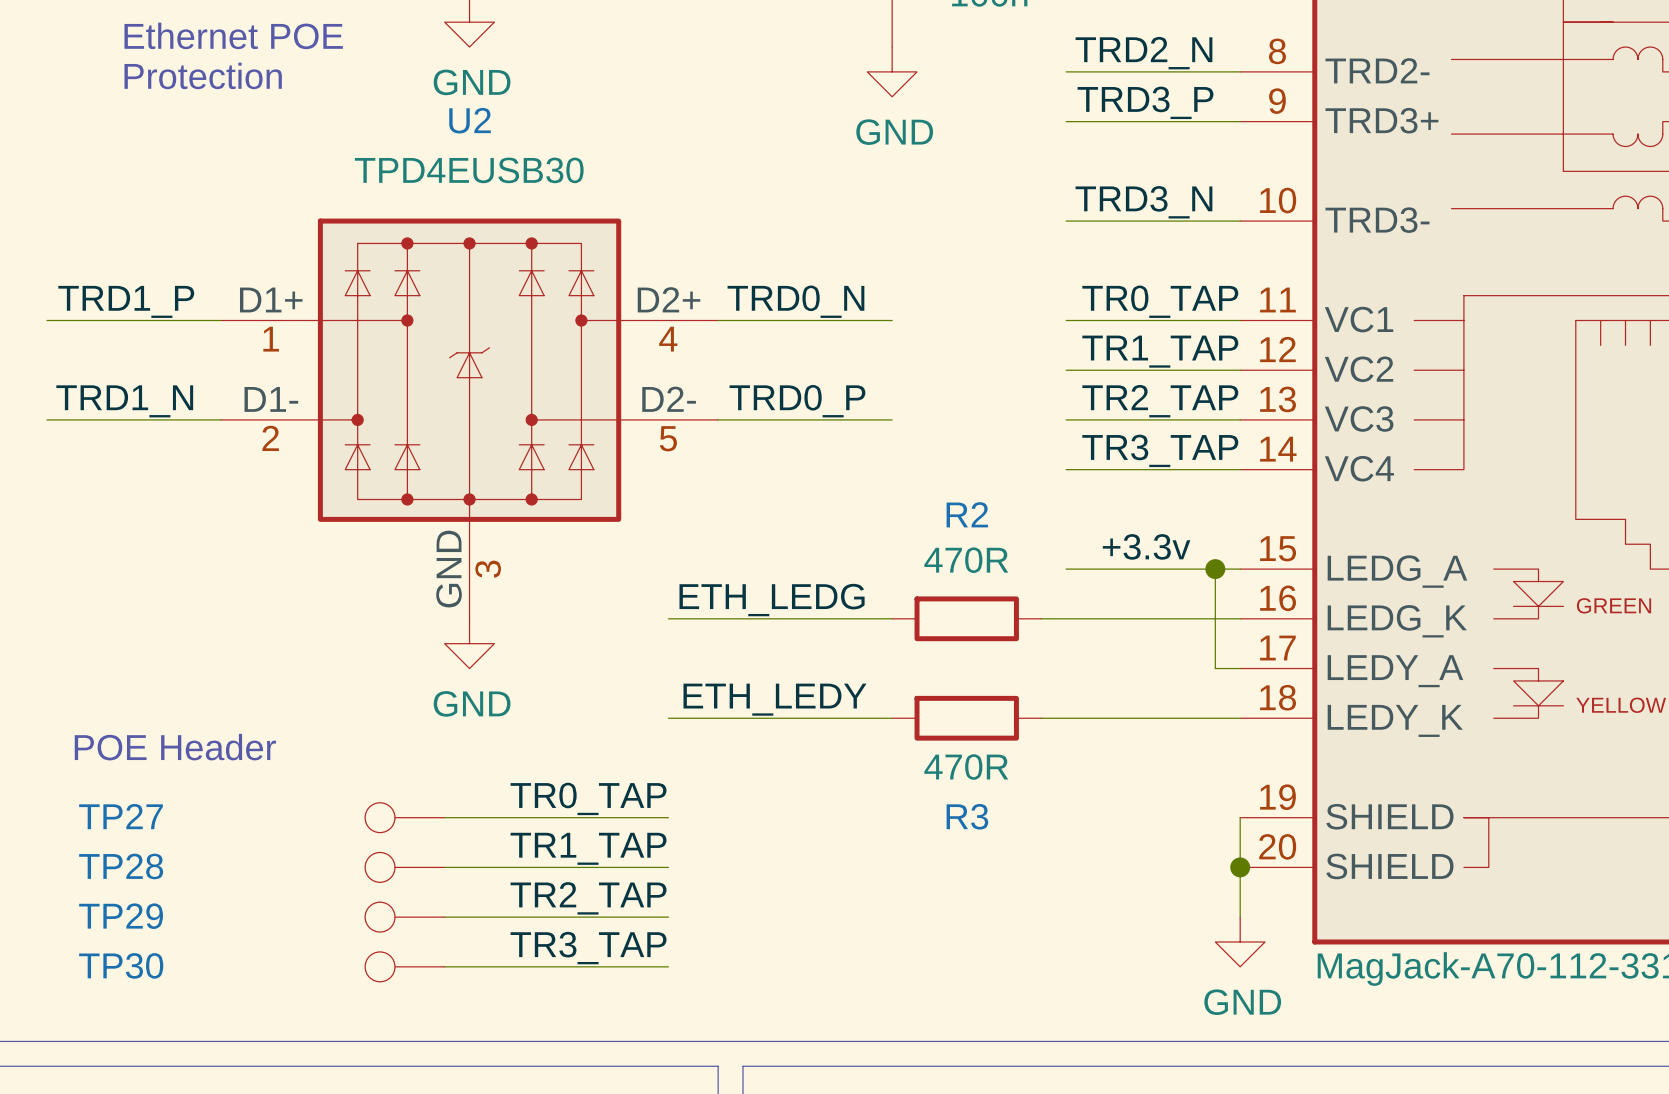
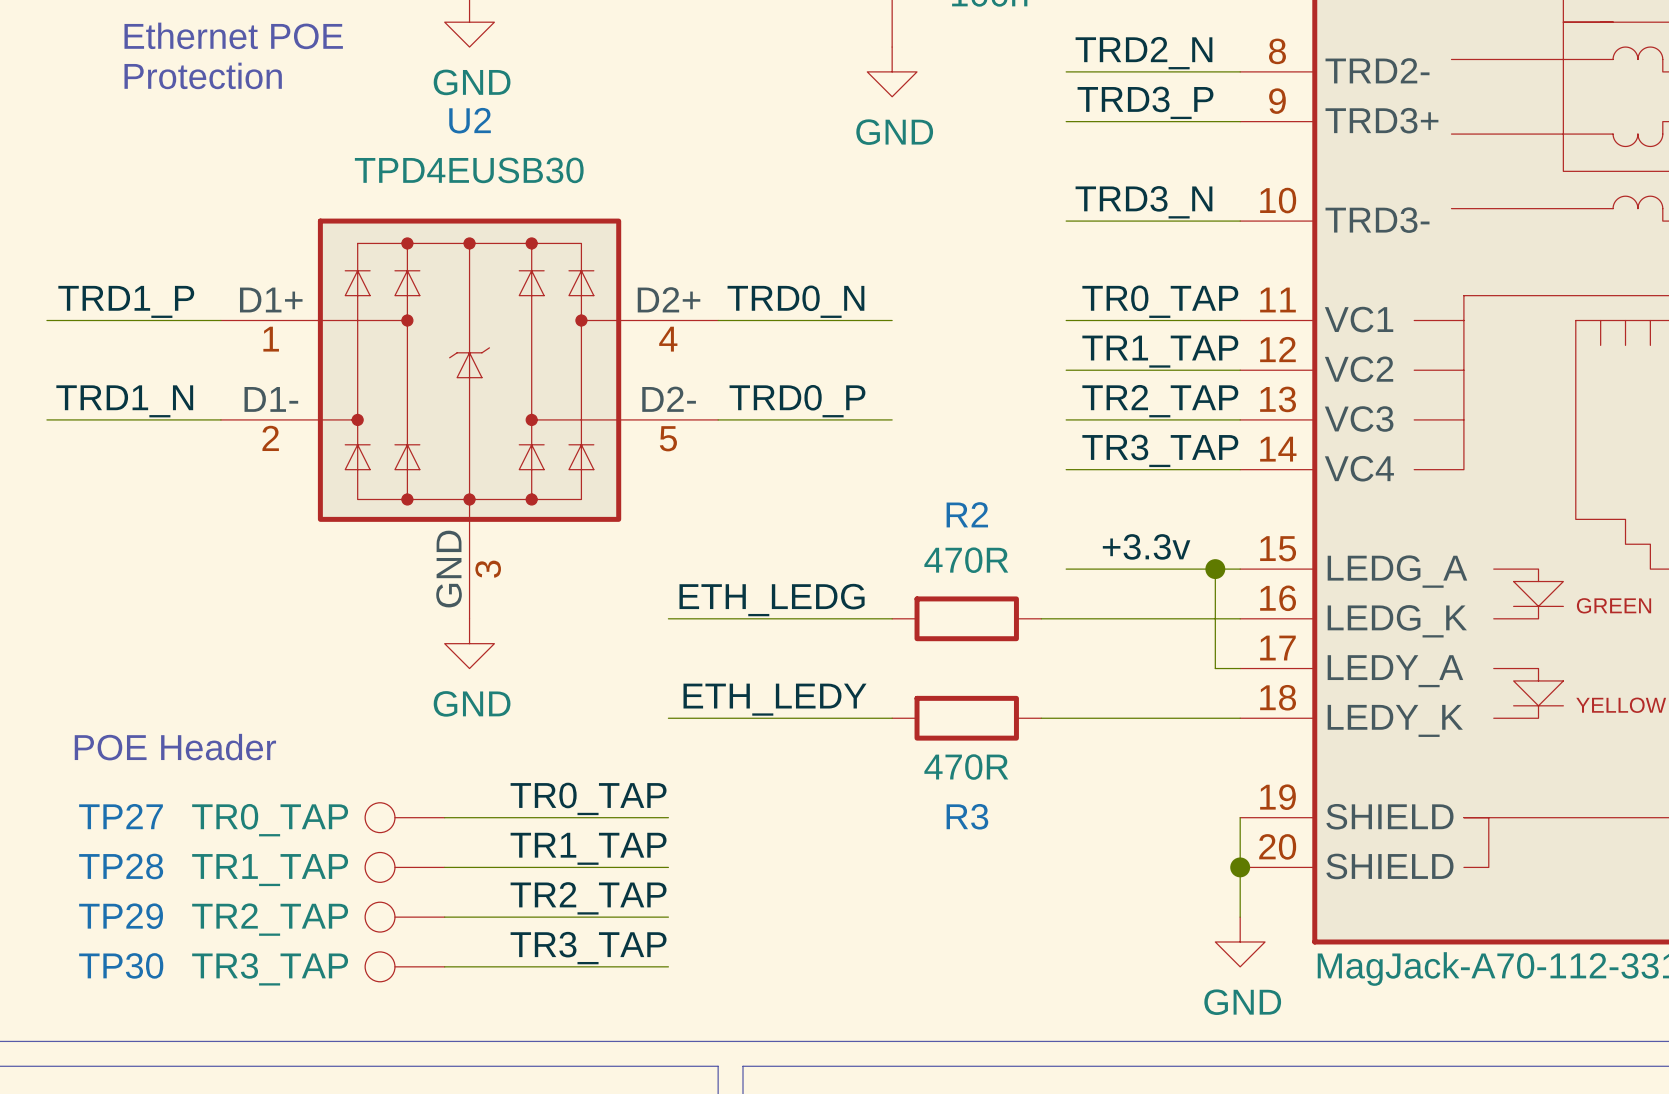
TP27 value: none -> TR0_TAP (270, 820)
TP28 value: none -> TR1_TAP (270, 870)
TP29 value: none -> TR2_TAP (270, 919)
TP30 value: none -> TR3_TAP (270, 969)

